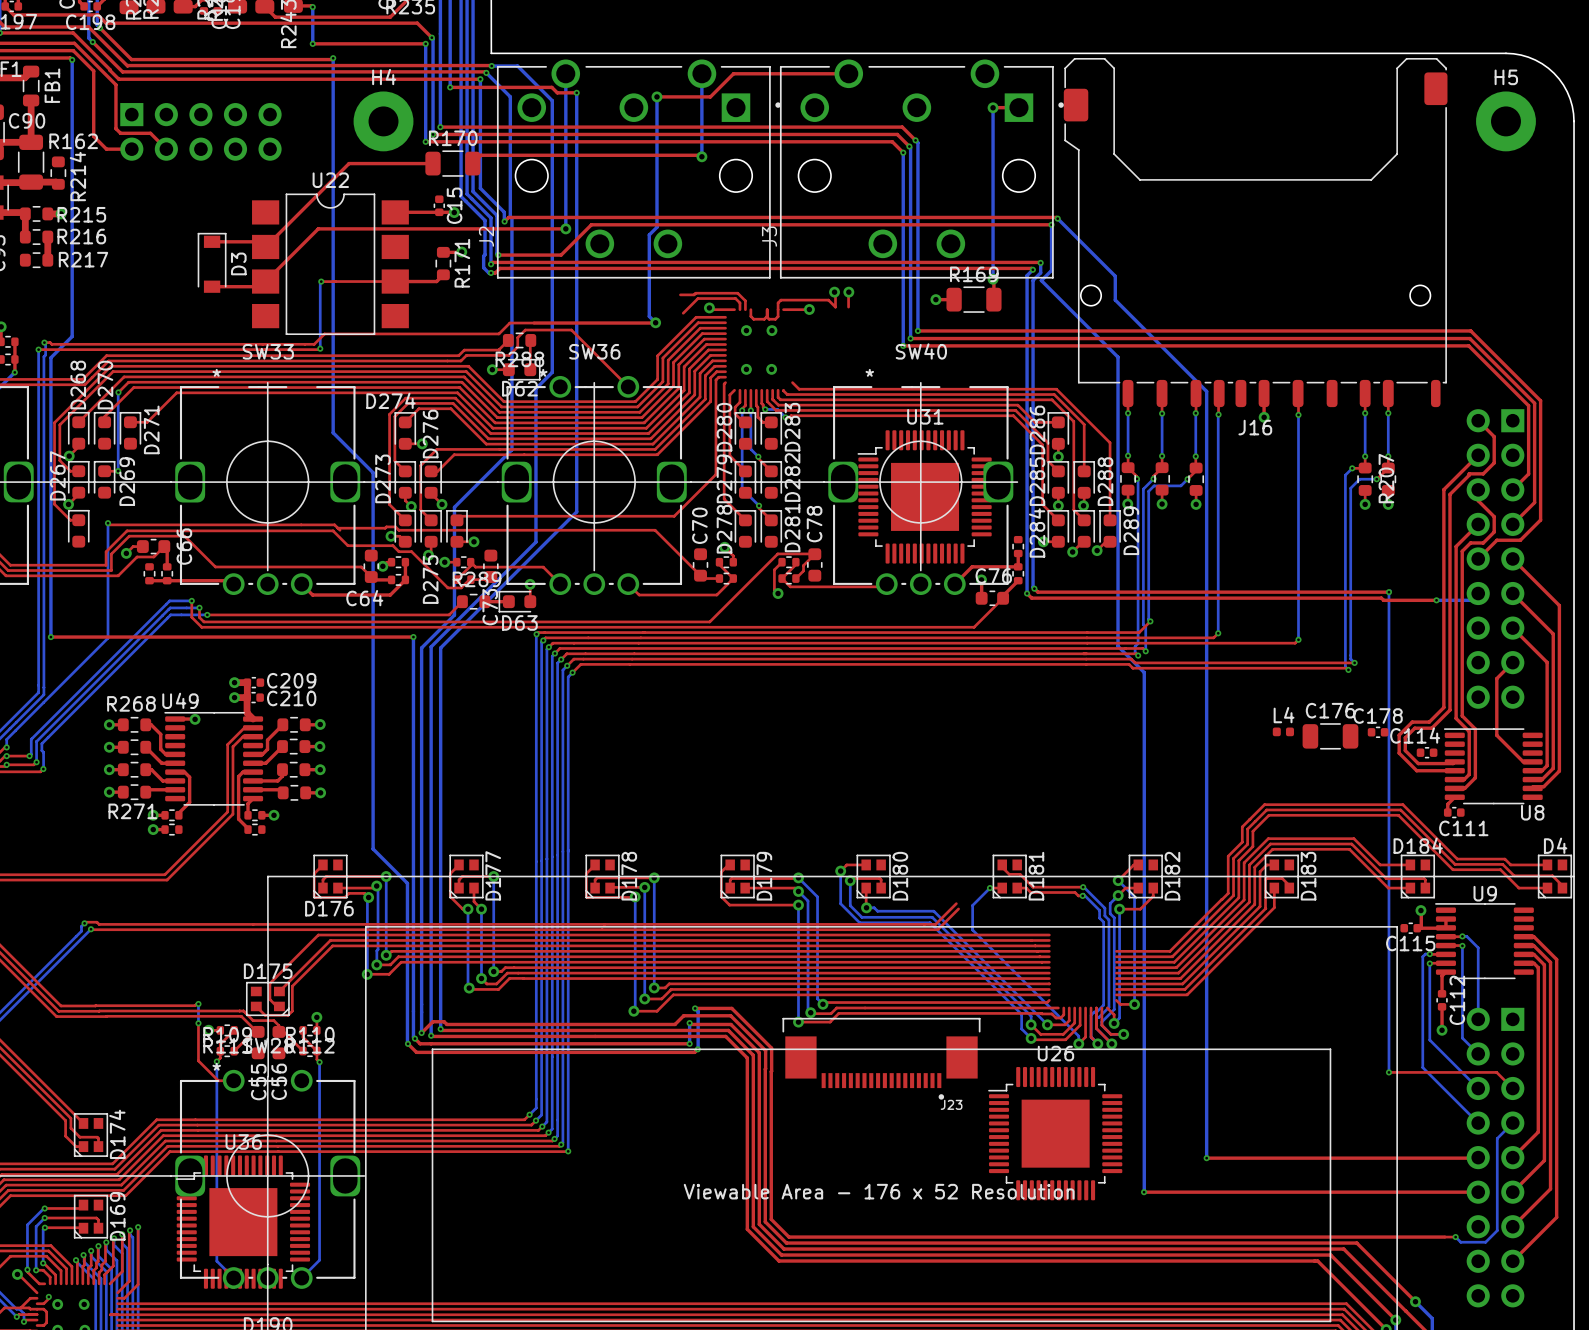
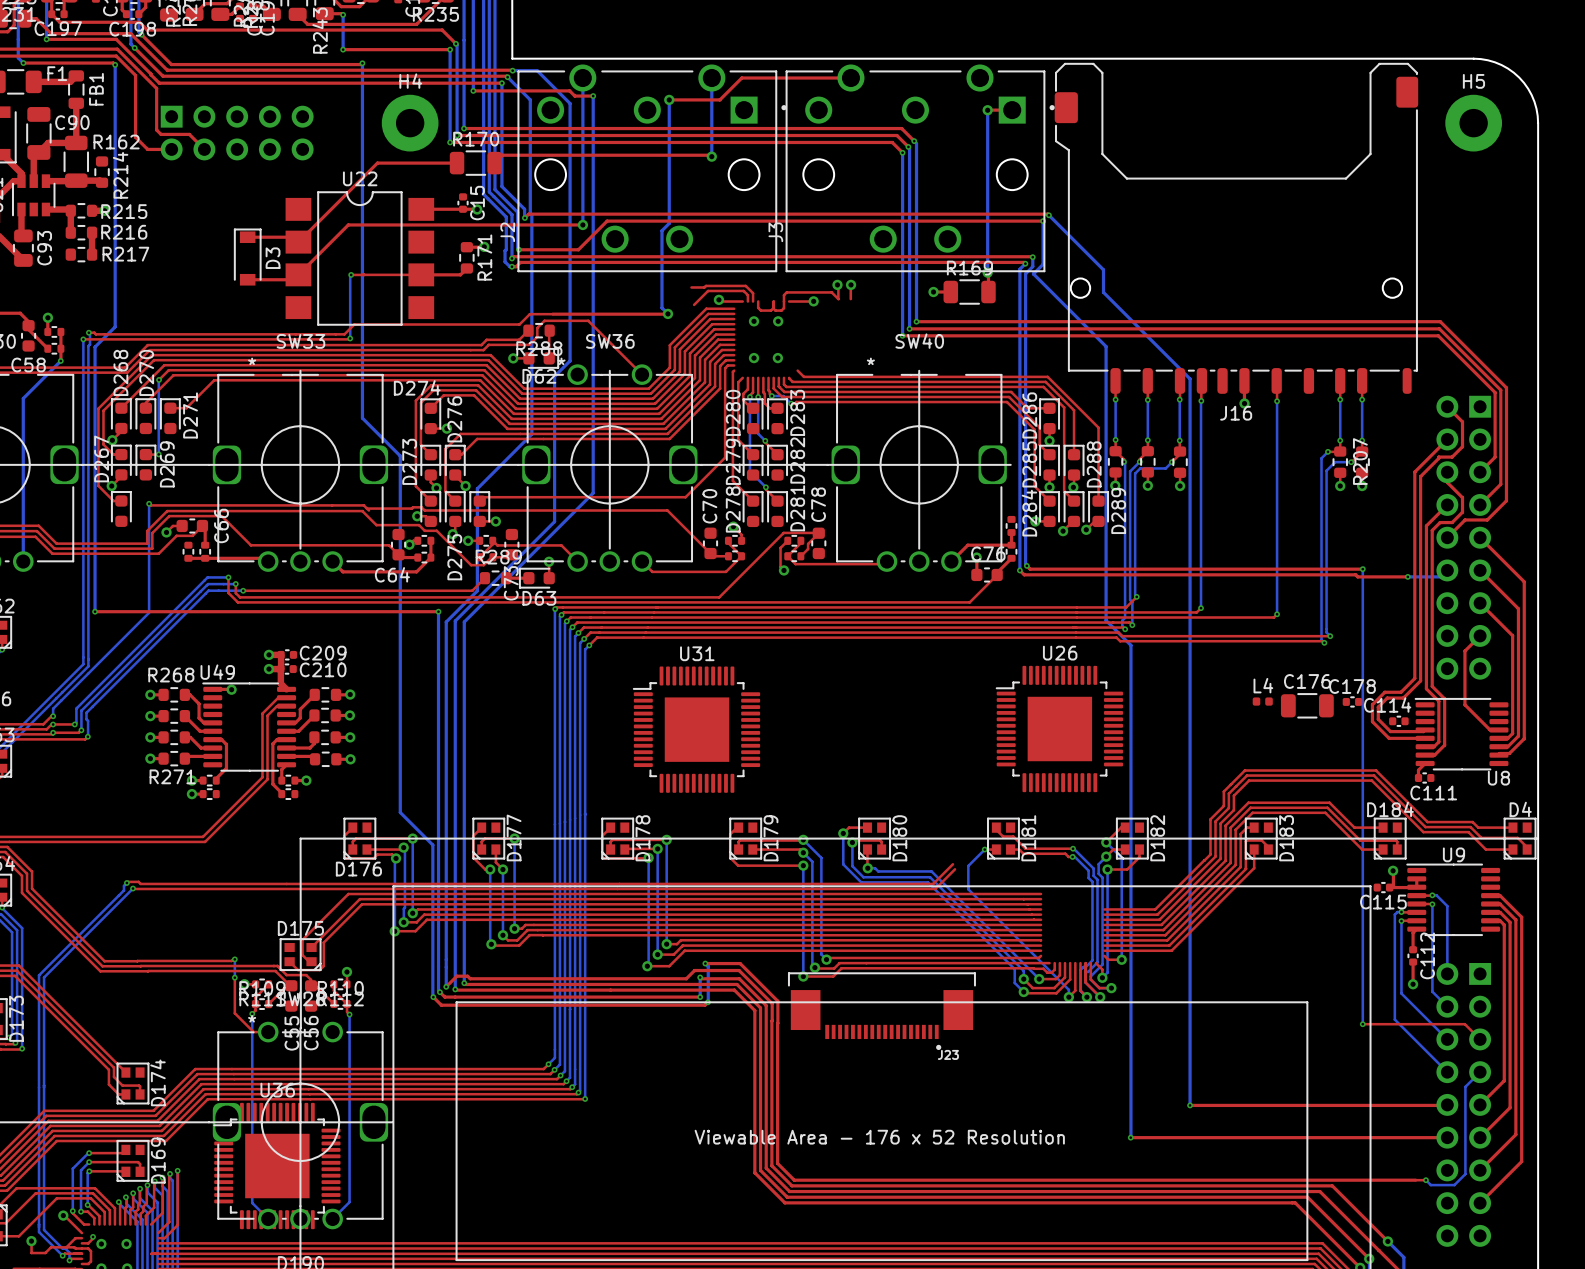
U31 position: (924, 496) -> (696, 729)
U26 position: (1055, 1133) -> (1059, 729)

